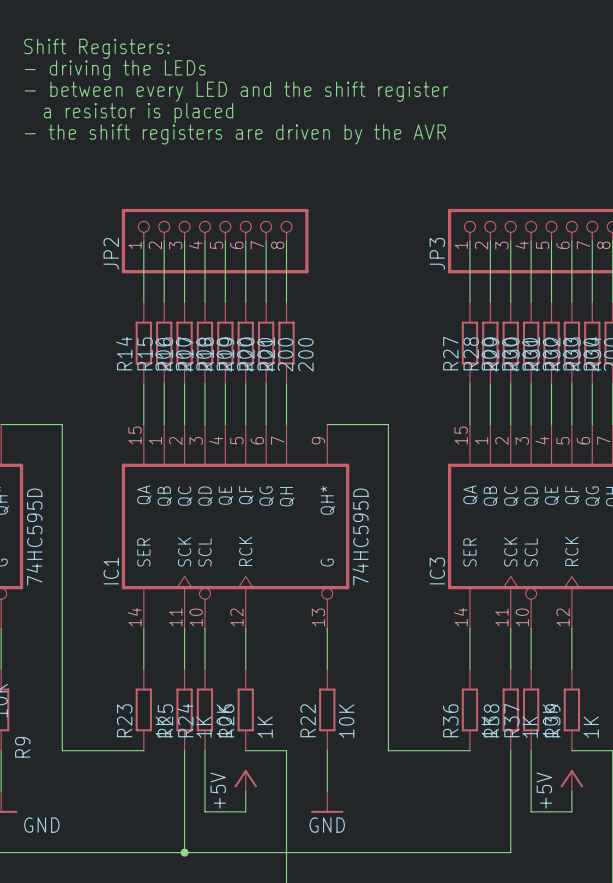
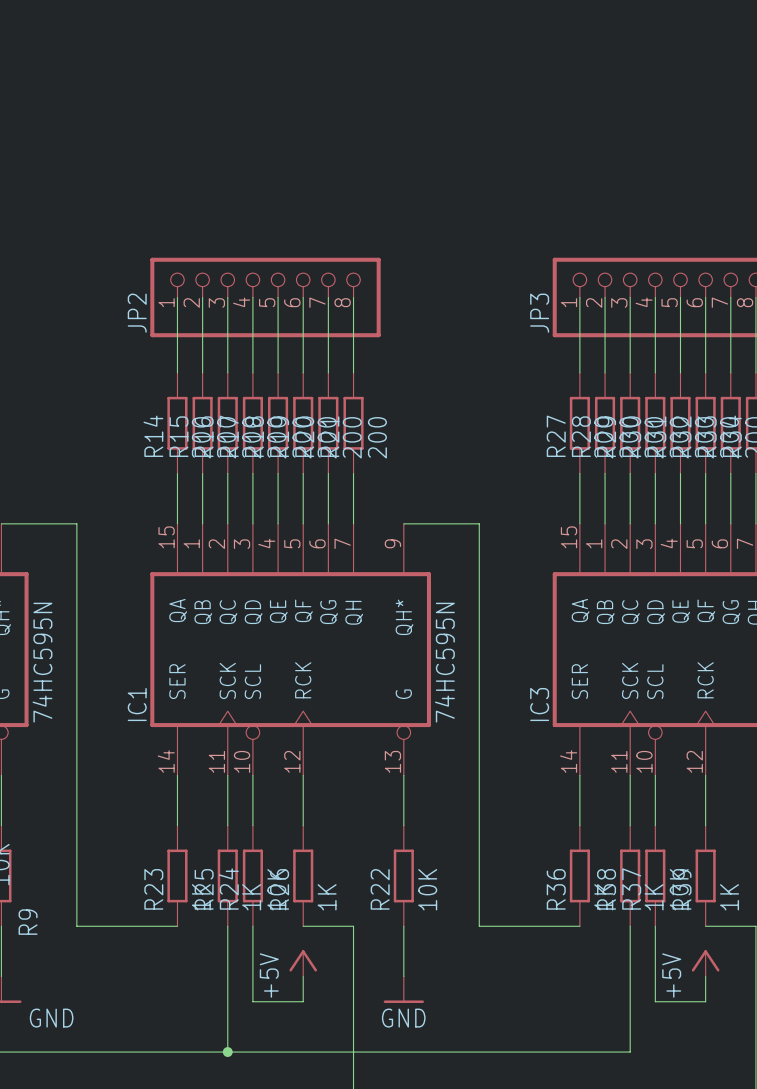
text: Shift Registers: (96, 48) -> none
text: - driving the LEDs (115, 70) -> none
text: - between every LED and the shift register (236, 91) -> none
text: a resistor is placed (138, 113) -> none
text: - the shift registers are driven by the AVR (235, 134) -> none
part value: 74HC595D (34, 537) -> 74HC595N (42, 662)
IC1 value: 74HC595D (360, 537) -> 74HC595N (444, 662)

